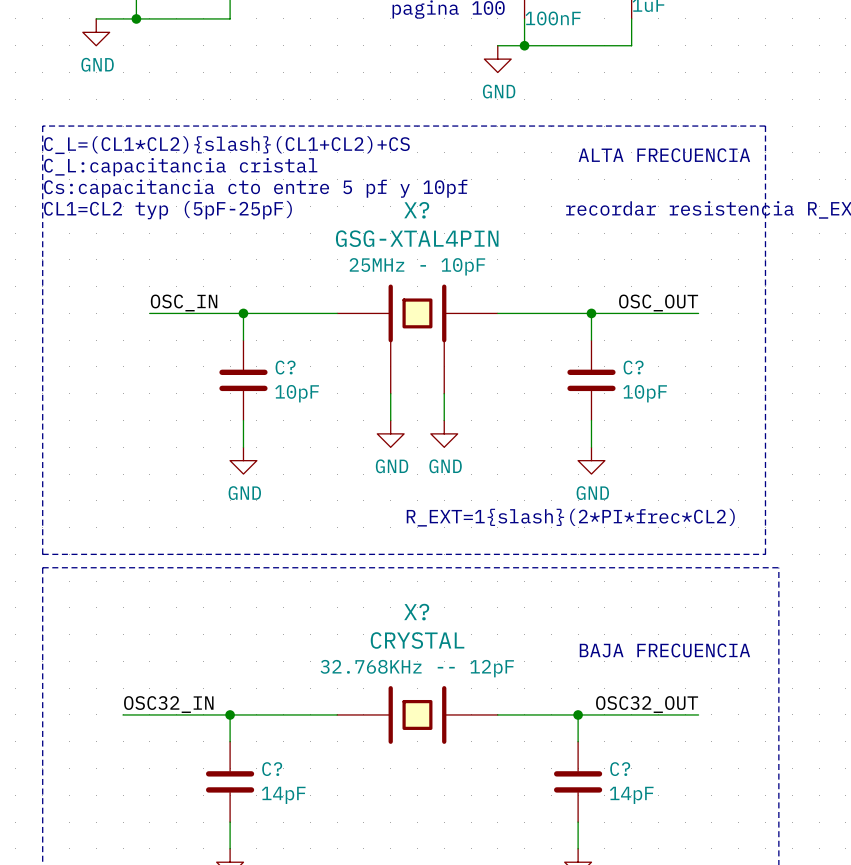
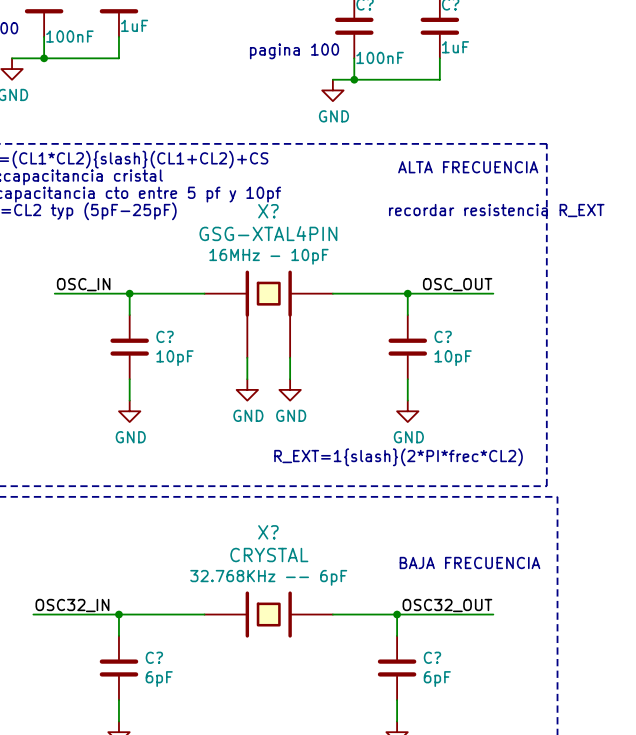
X? text: 25MHz - 10pF (417, 266) -> 16MHz - 10pF (268, 256)
X? text: 32.768KHz -- 12pF (417, 668) -> 32.768KHz -- 6pF (268, 577)
C? value: 14pF (283, 795) -> 6pF (159, 679)
C? value: 14pF (631, 795) -> 6pF (437, 679)

